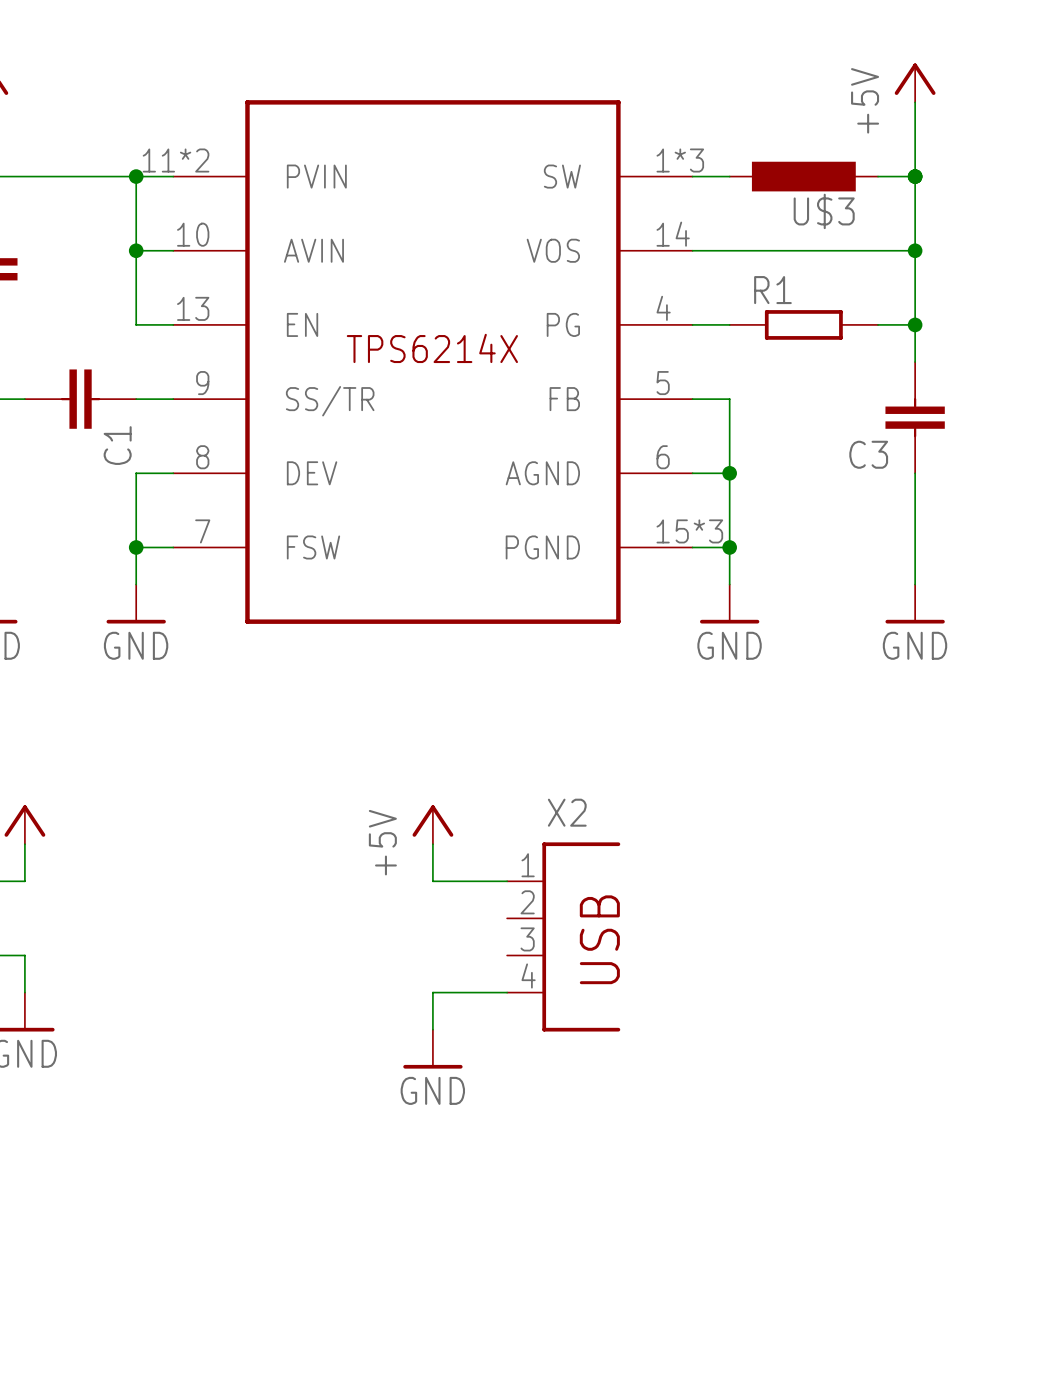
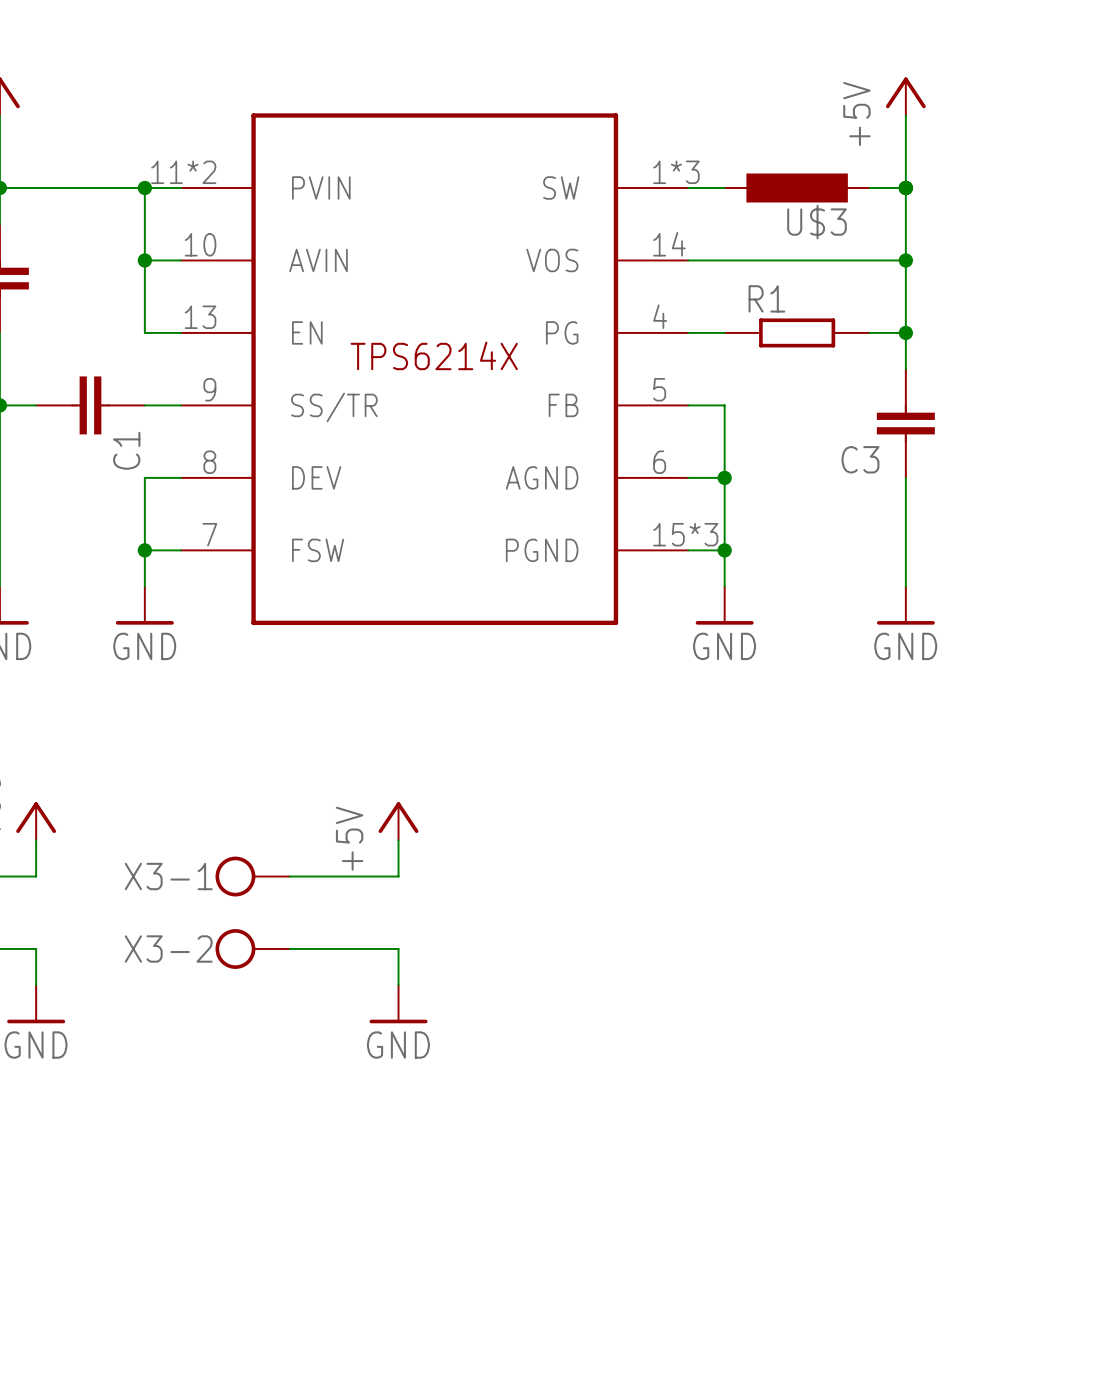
power symbol position: +5V (432, 824) -> +5V (398, 821)
wire: none -> (398, 840) (398, 876) (289, 876)
wire: (432, 844) (432, 881) (507, 881) -> none
X3-1: none -> (252, 876)
X2: (563, 936) -> none
X3-2: none -> (252, 949)
wire: none -> (289, 949) (398, 949) (398, 985)
wire: (507, 992) (432, 992) (432, 1029) -> none
power symbol position: GND (432, 1049) -> GND (398, 1004)

